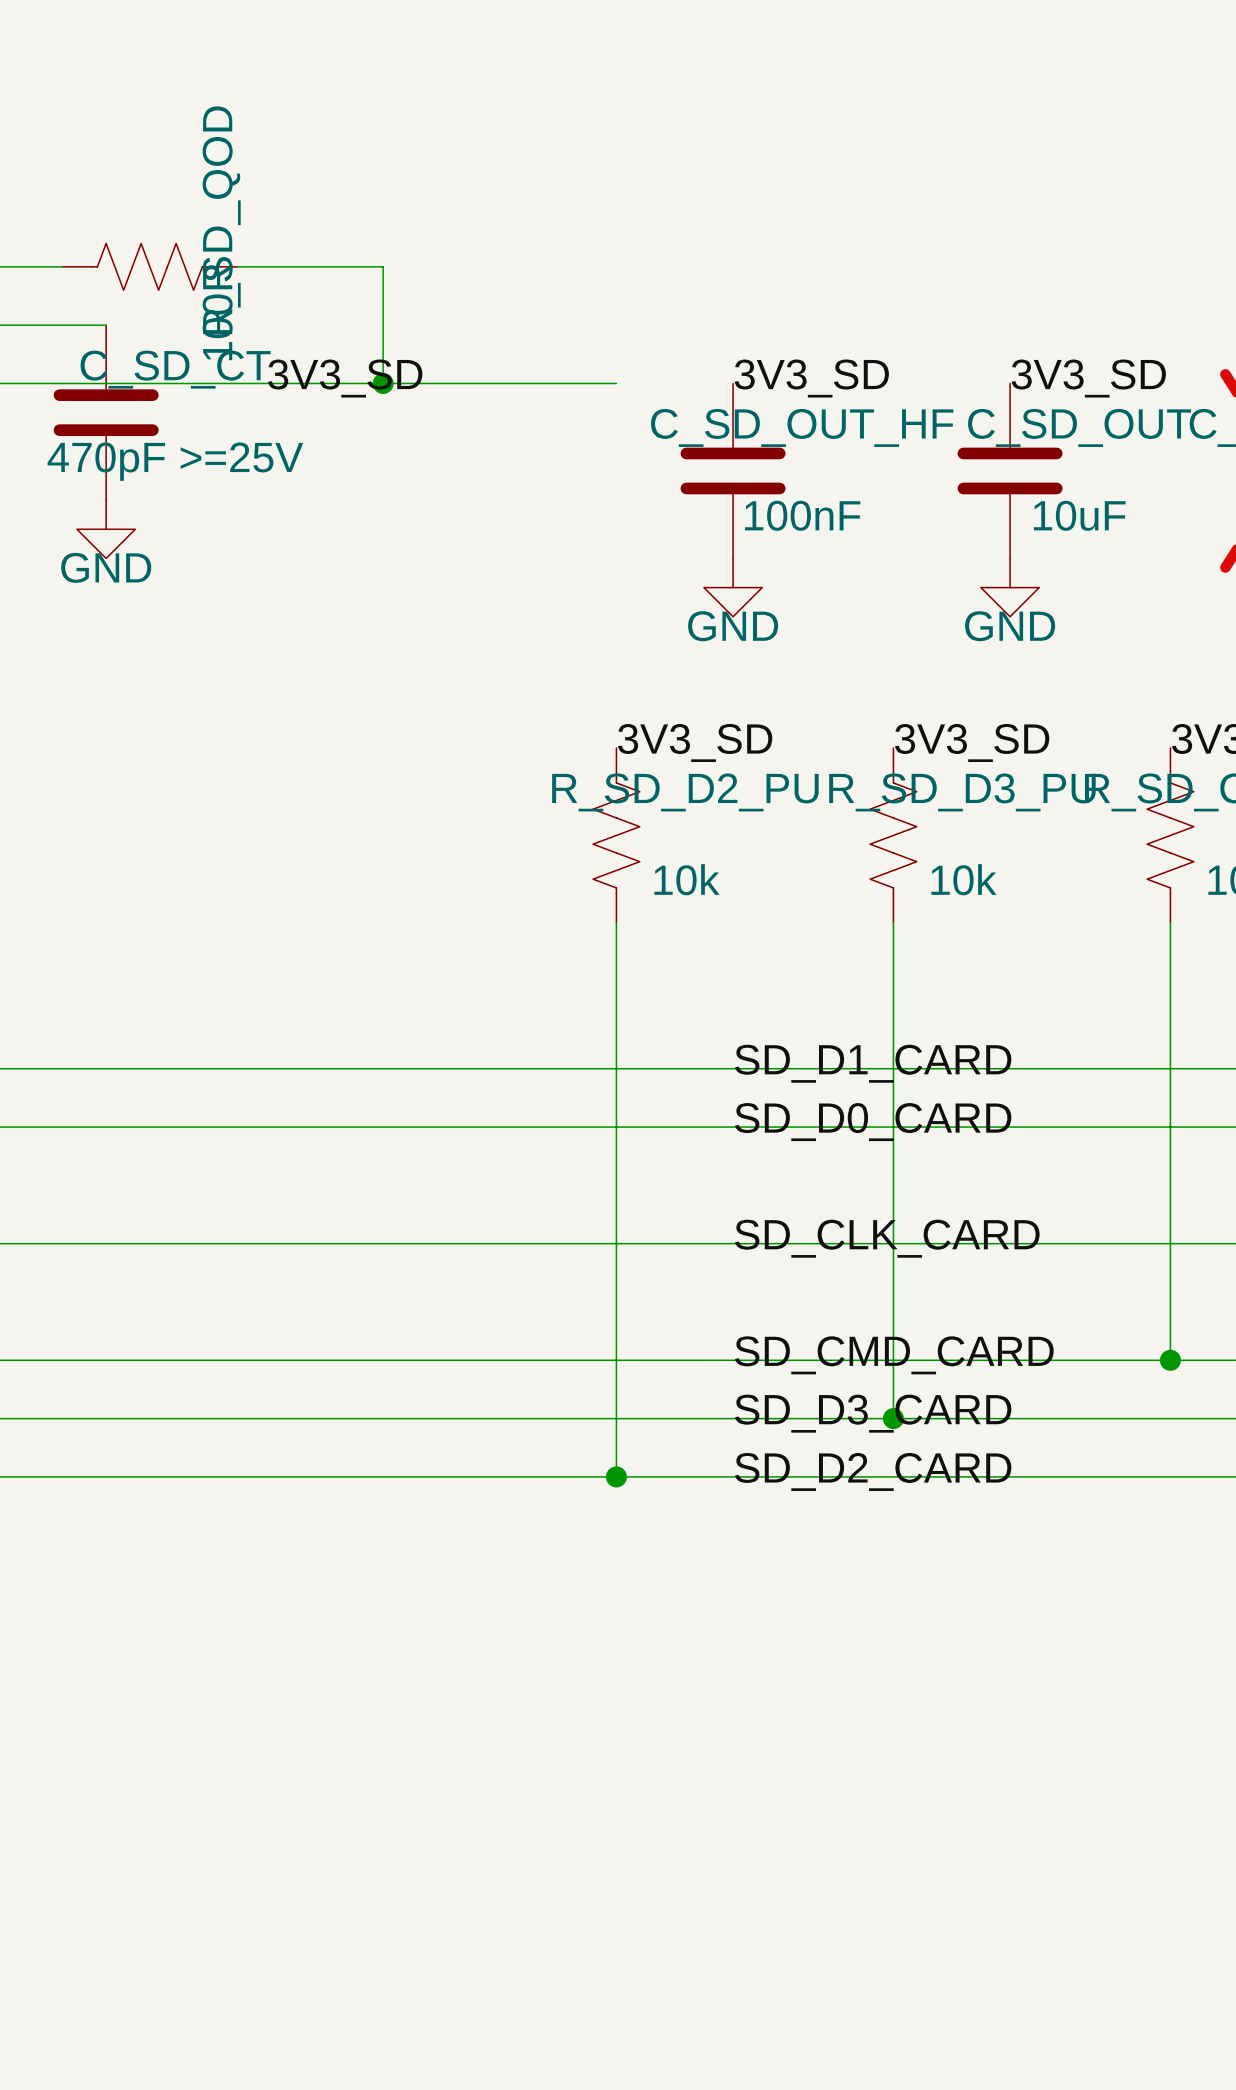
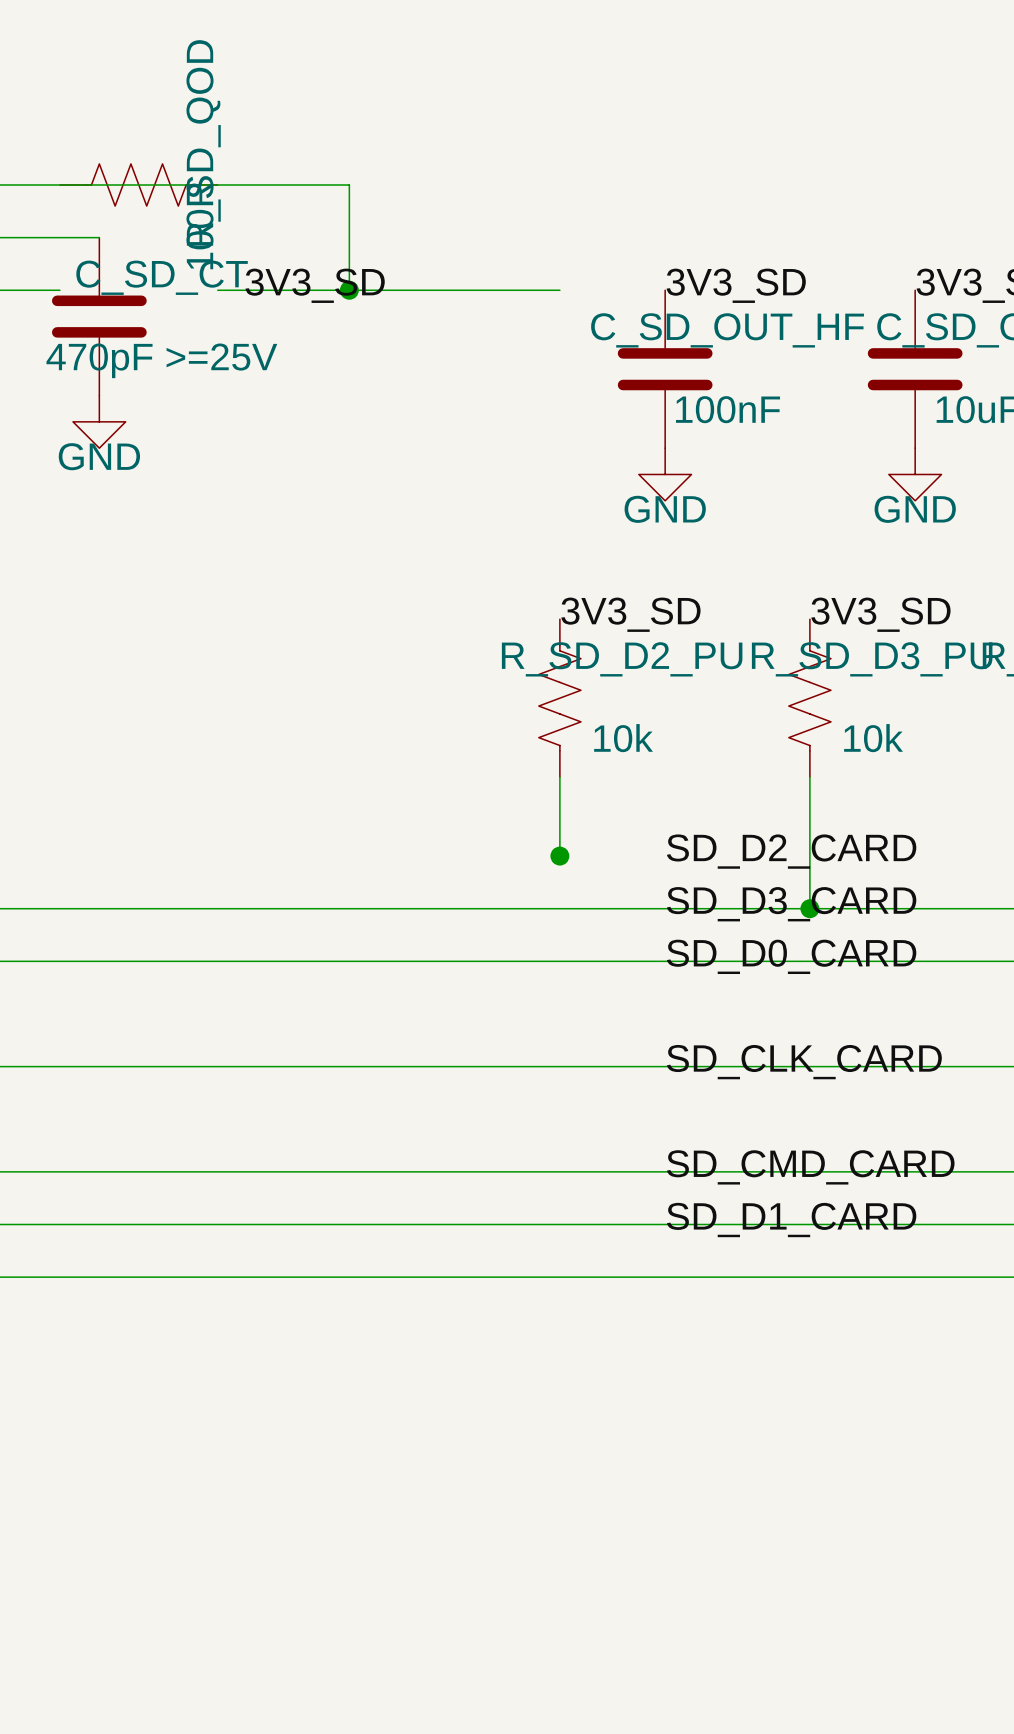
wire: (62, 383) (237, 383) -> (59, 185) (217, 185)
wire: (616, 1010) (616, 1476) -> none
junction: none -> (559, 856)
label: SD_D1_CARD (873, 1063) -> SD_D3_CARD (791, 904)
wire: (893, 1068) (893, 1418) -> none
junction: none -> (809, 908)
label: SD_D3_CARD (873, 1413) -> SD_D1_CARD (791, 1220)
junction: (893, 1418) -> none
label position: SD_D2_CARD (873, 1471) -> SD_D2_CARD (791, 851)
junction: (616, 1476) -> none

